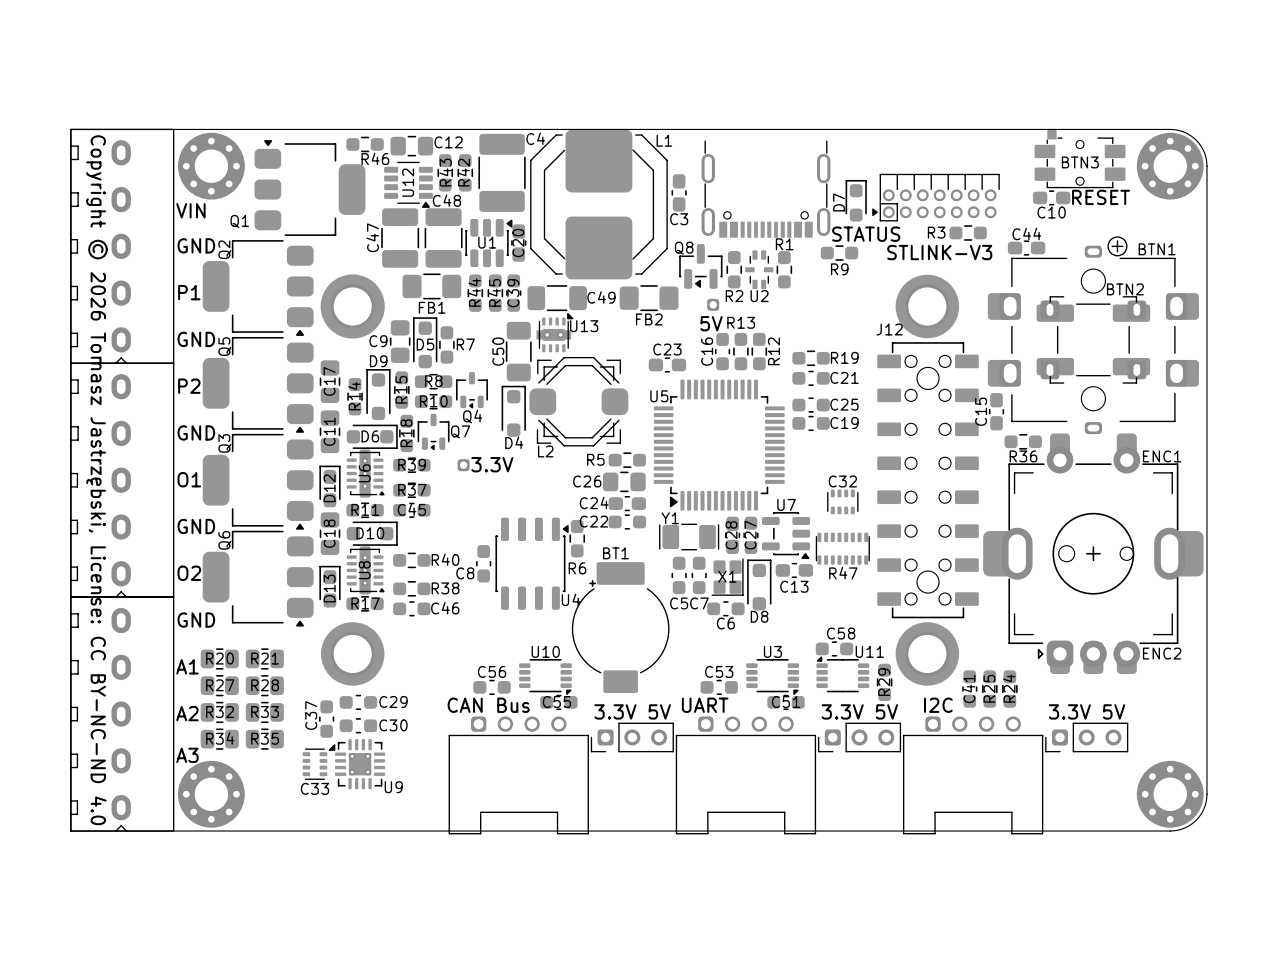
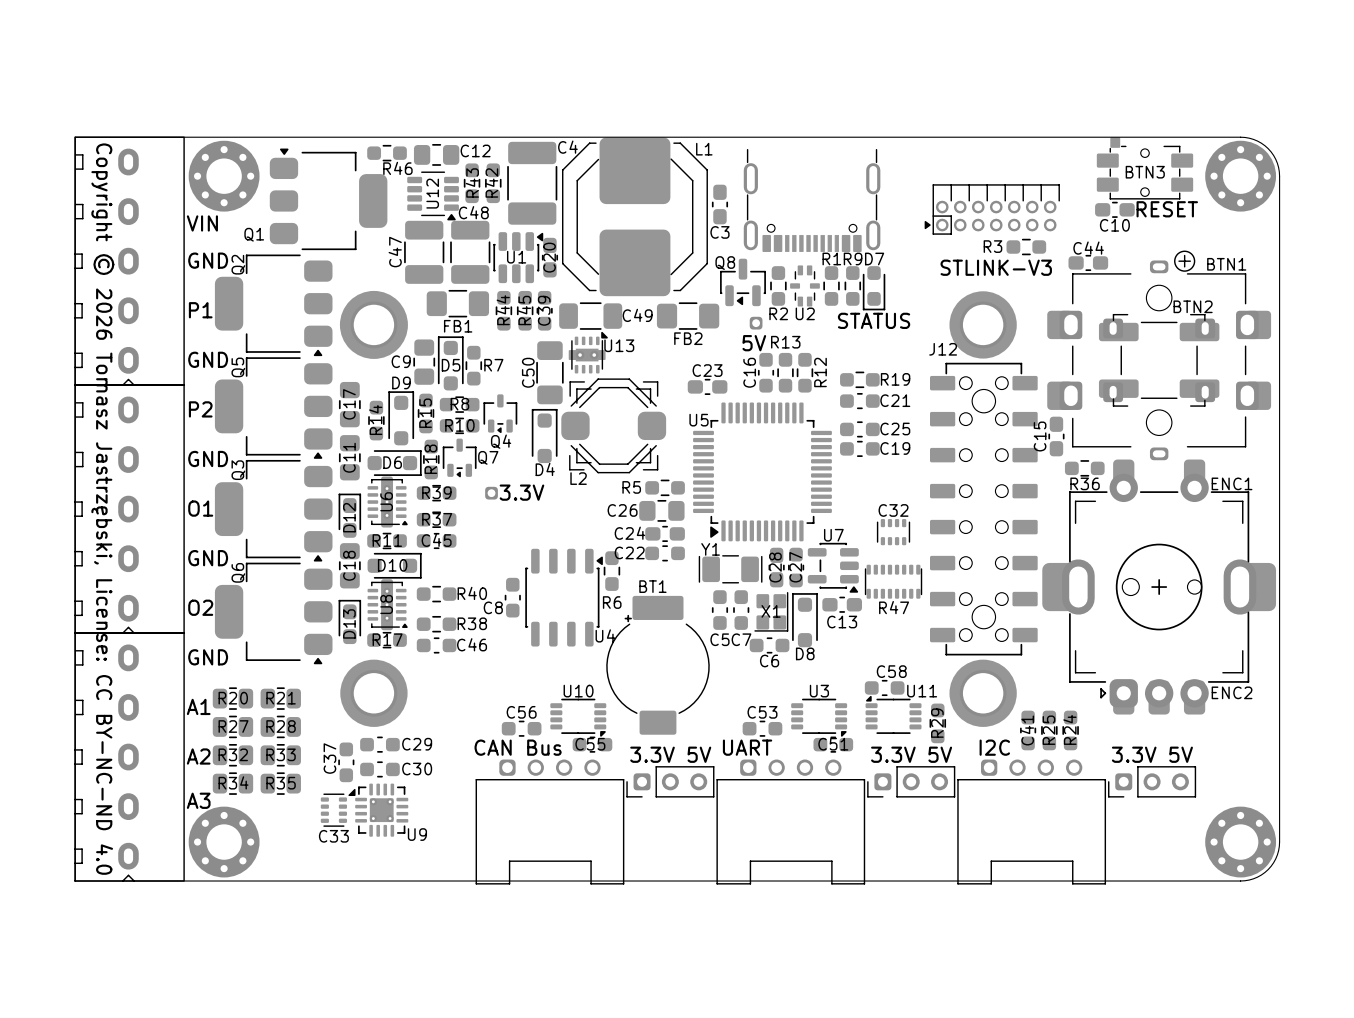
D7 rotation: 0° (856, 200) -> 180° (874, 288)
D7 position: (856, 200) -> (874, 288)
D7 name position: D7 (839, 202) -> D7 (874, 258)
R9 rotation: 0° (839, 253) -> 90° clockwise (852, 285)
R9 position: (839, 253) -> (852, 285)
R9 name position: R9 (839, 269) -> R9 (853, 258)

